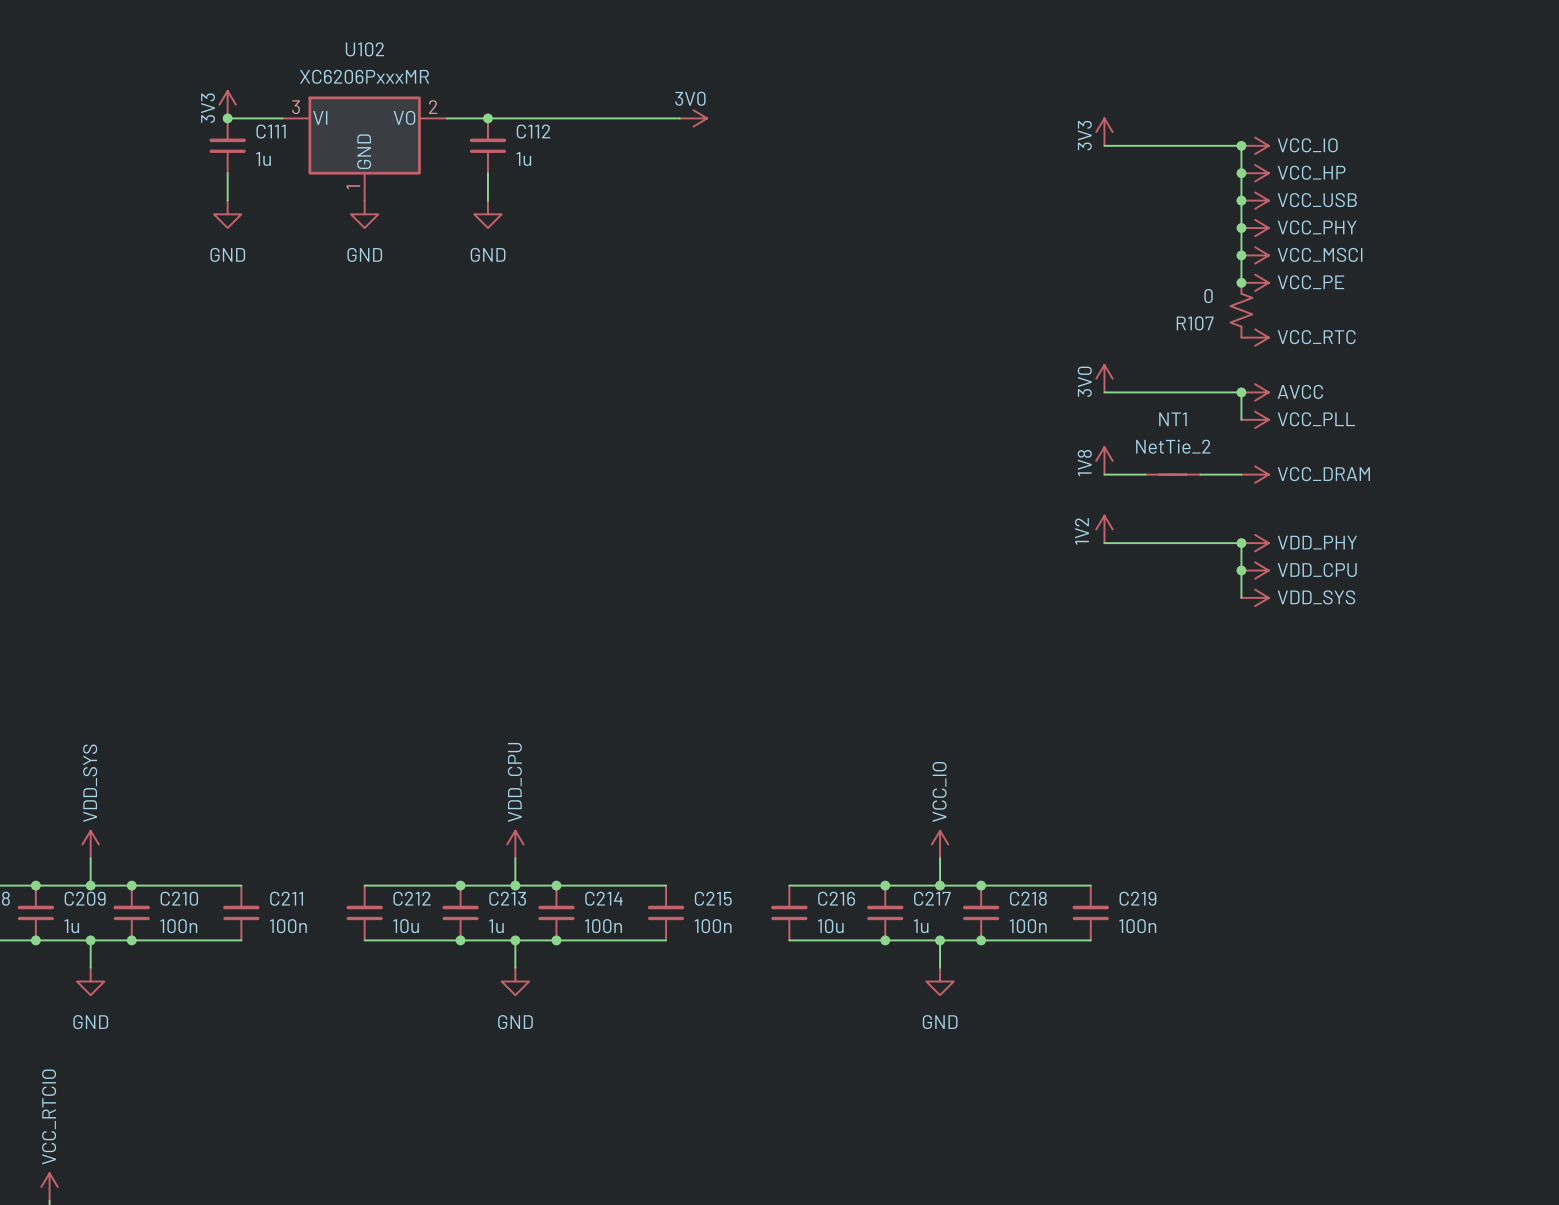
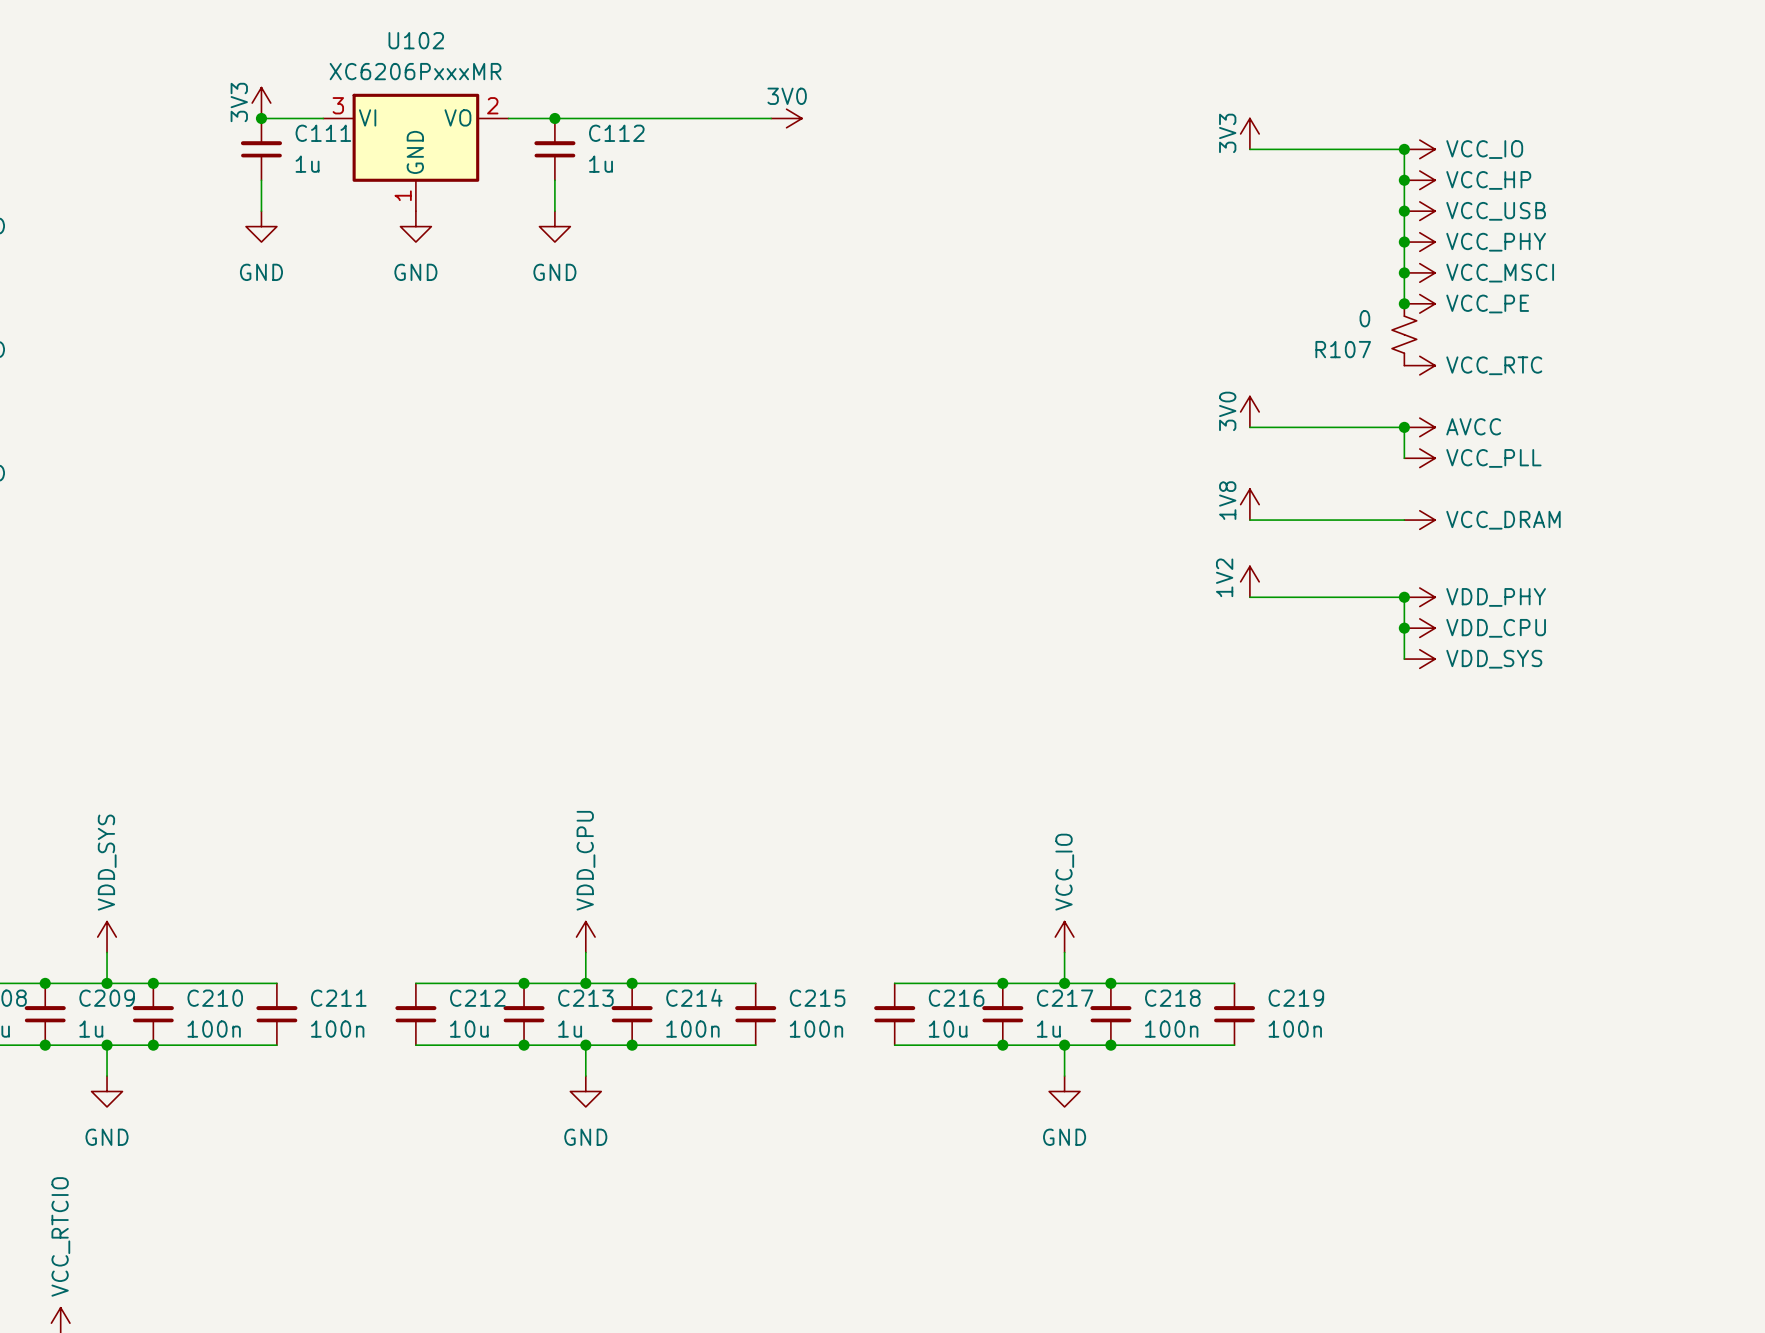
NT1: NetTie_2 (1172, 474) -> none

